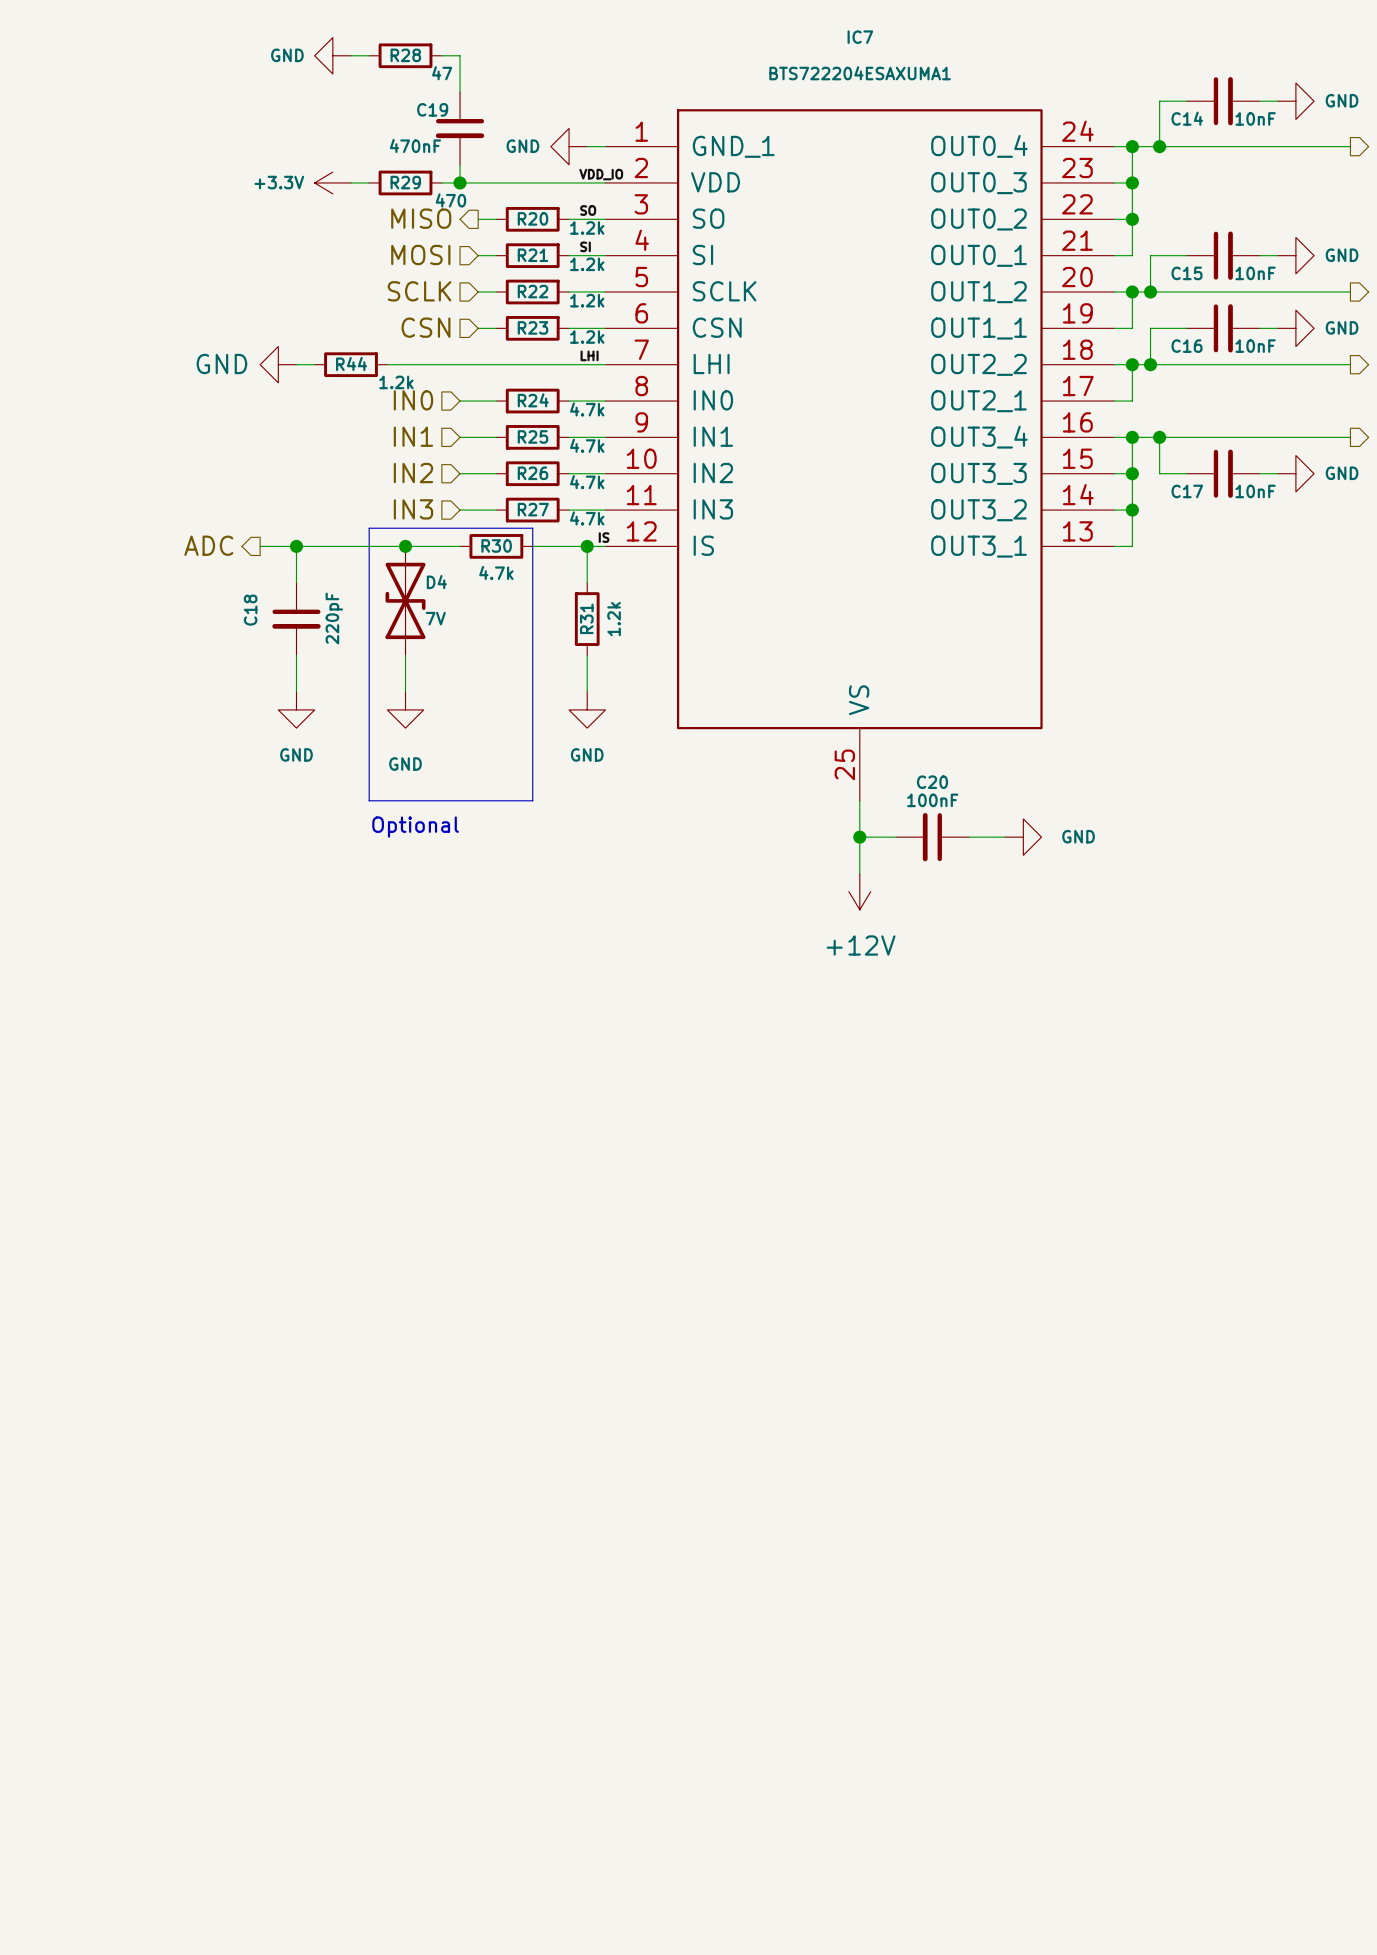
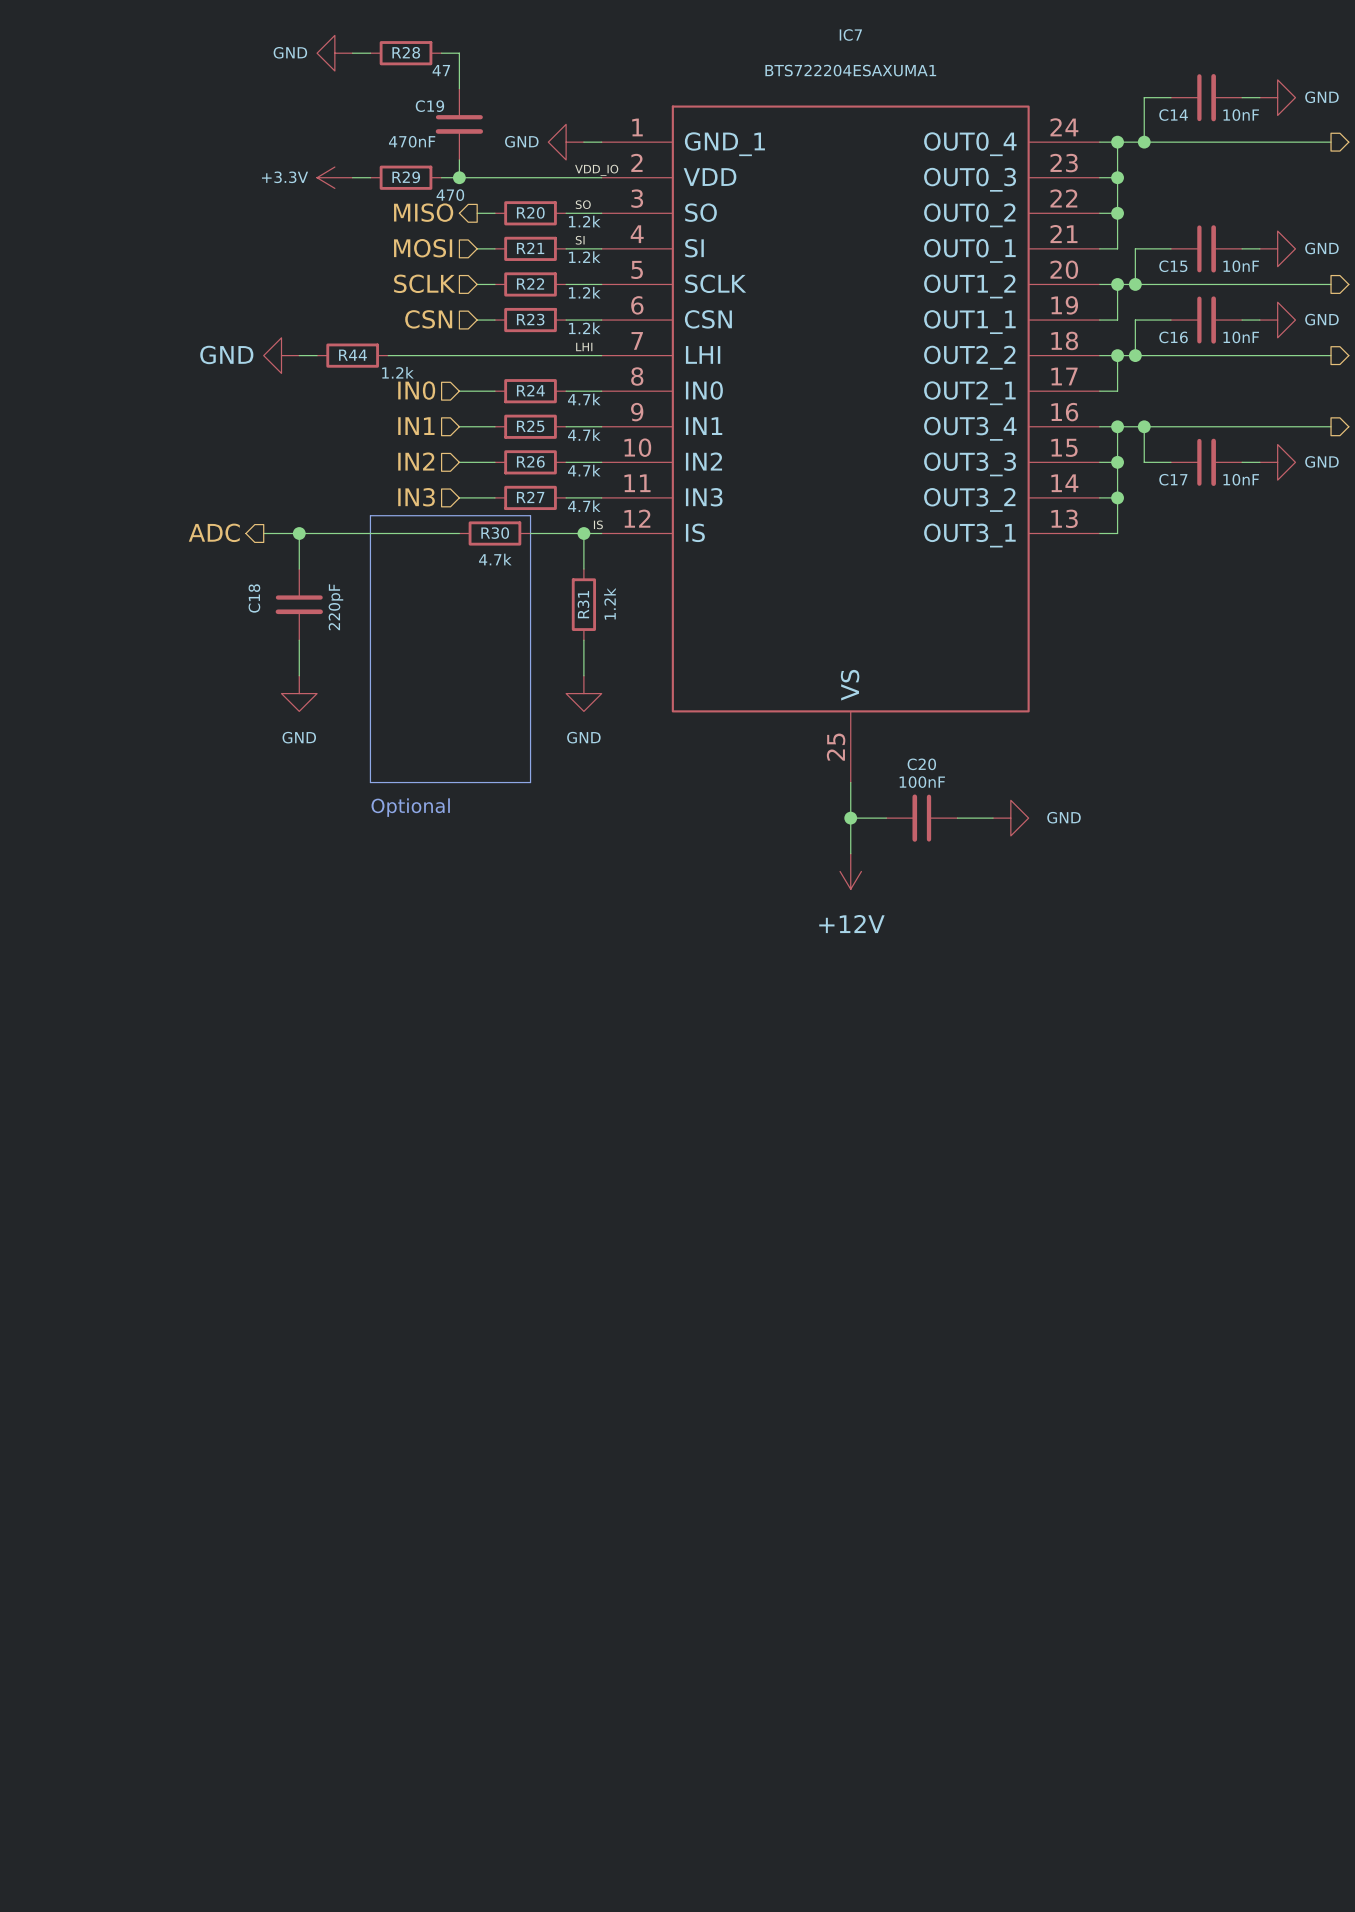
junction: (405, 546) -> none
D4: 7V (405, 600) -> none
wire: (405, 655) (405, 691) -> none
power symbol: GND (405, 709) -> none

